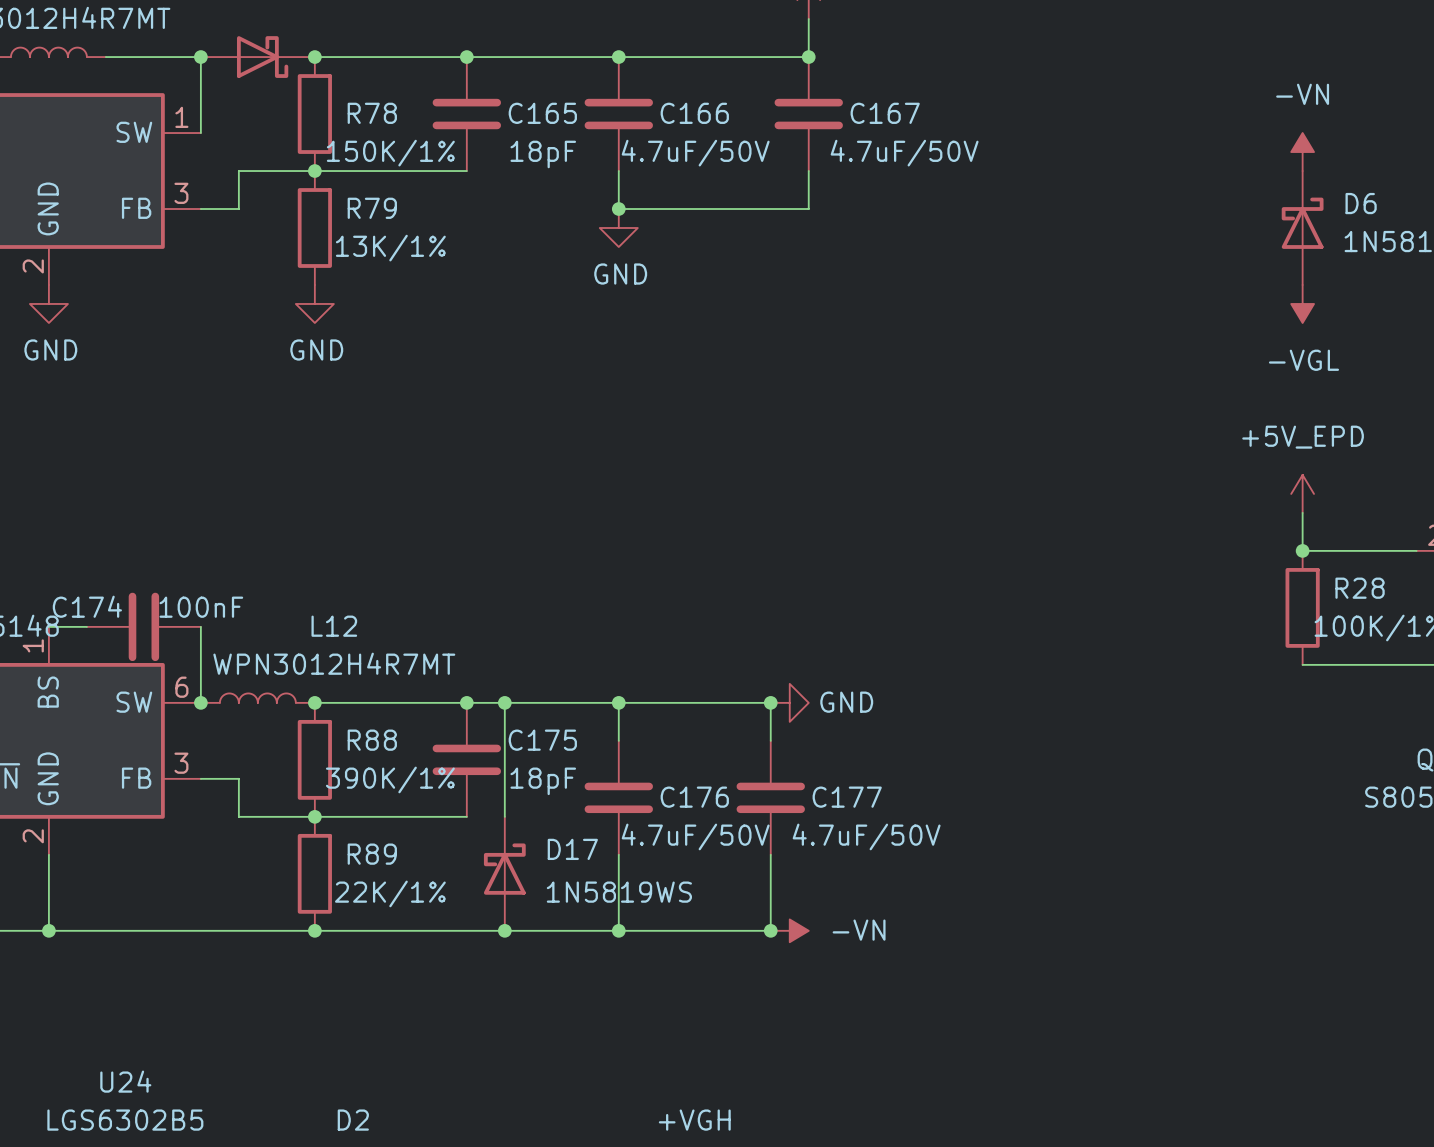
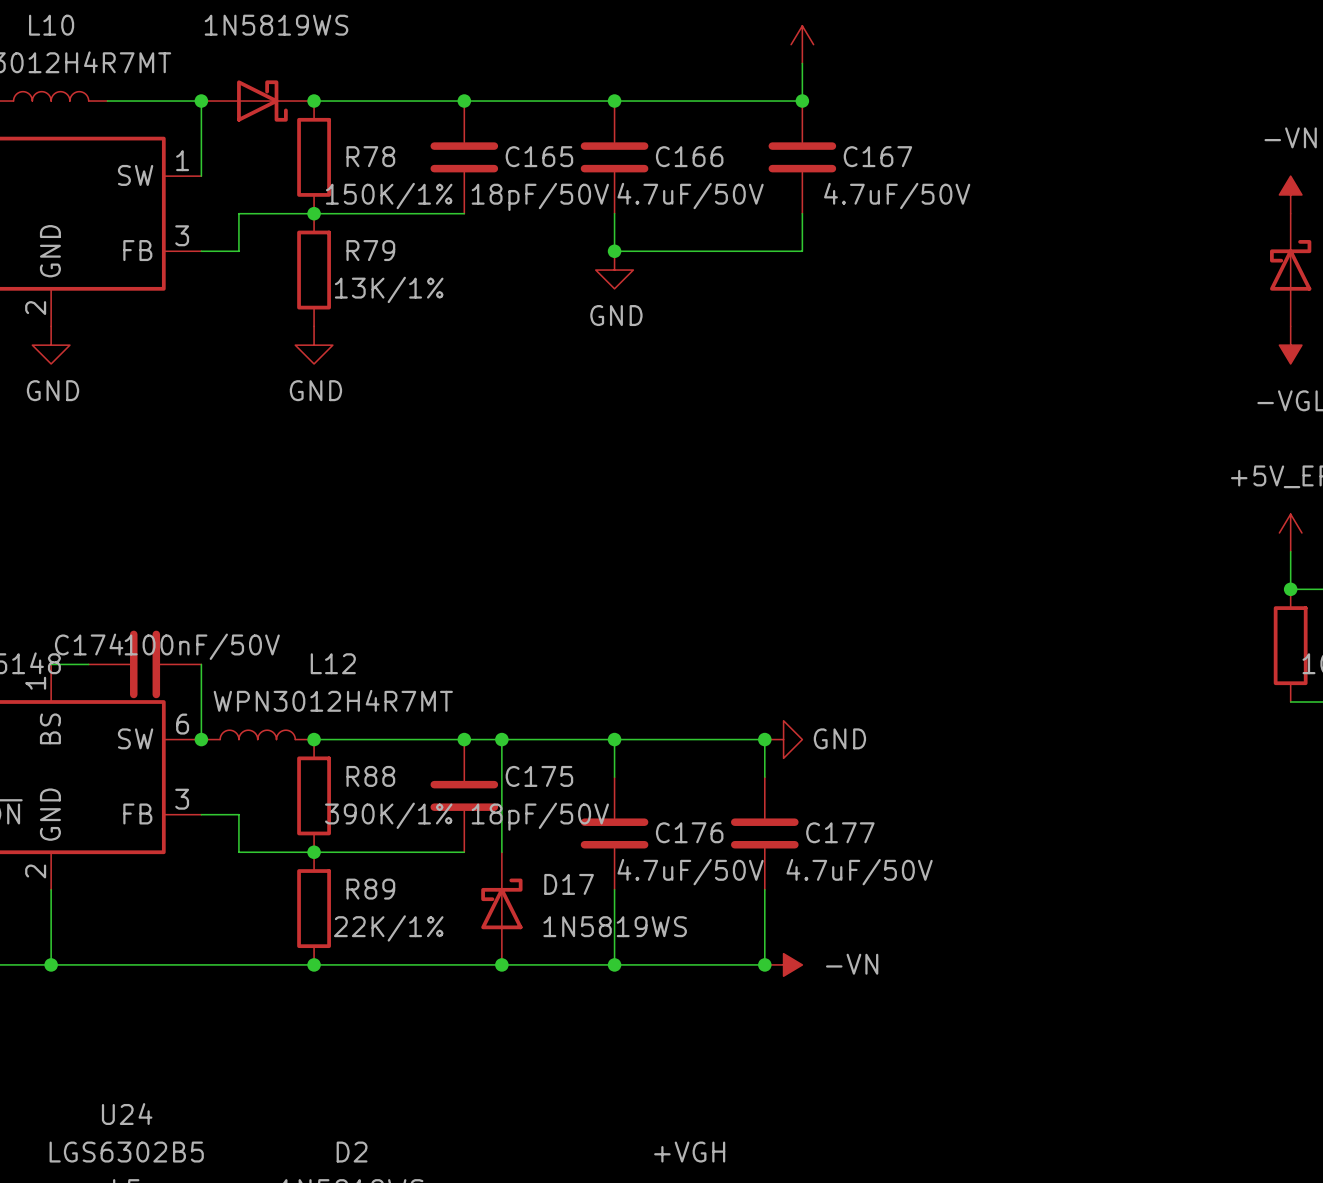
C165 value: 18pF (543, 154) -> 18pF/50V (540, 196)
C174 value: 100nF (201, 607) -> 100nF/50V (202, 646)
C175 value: 18pF (543, 781) -> 18pF/50V (540, 816)

